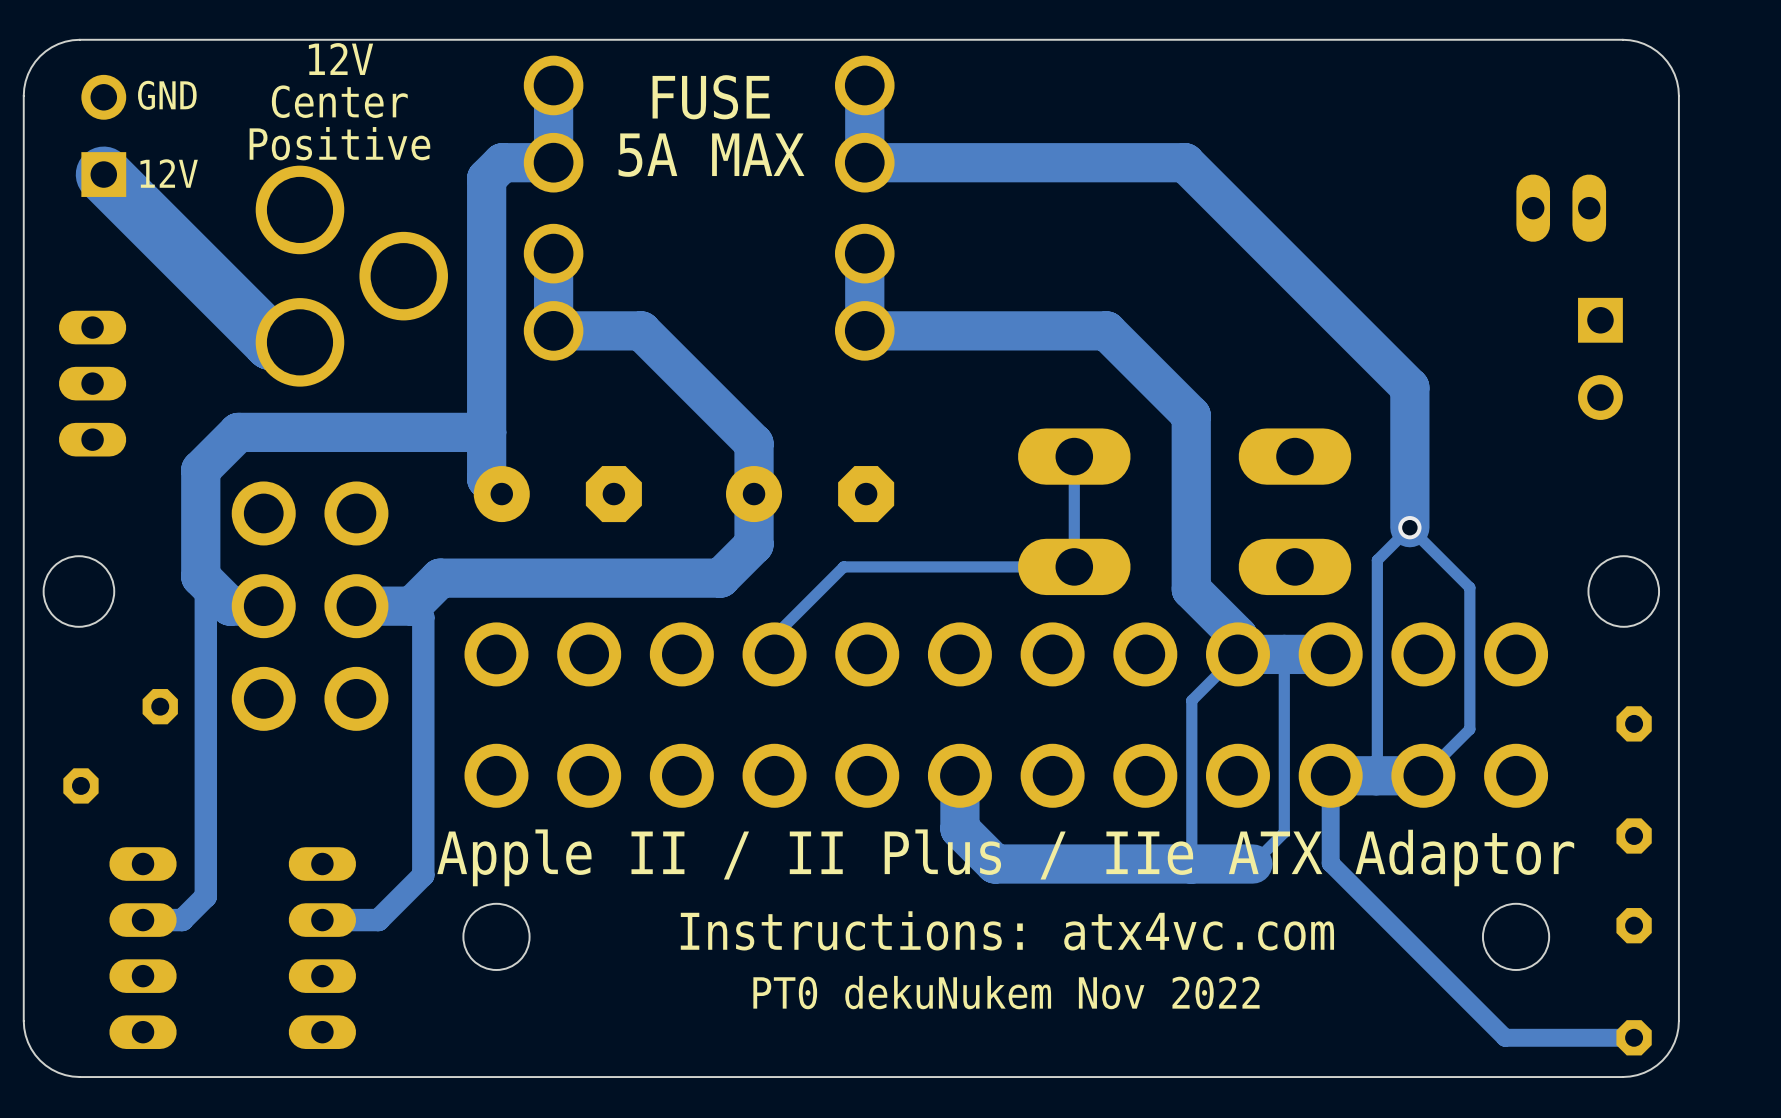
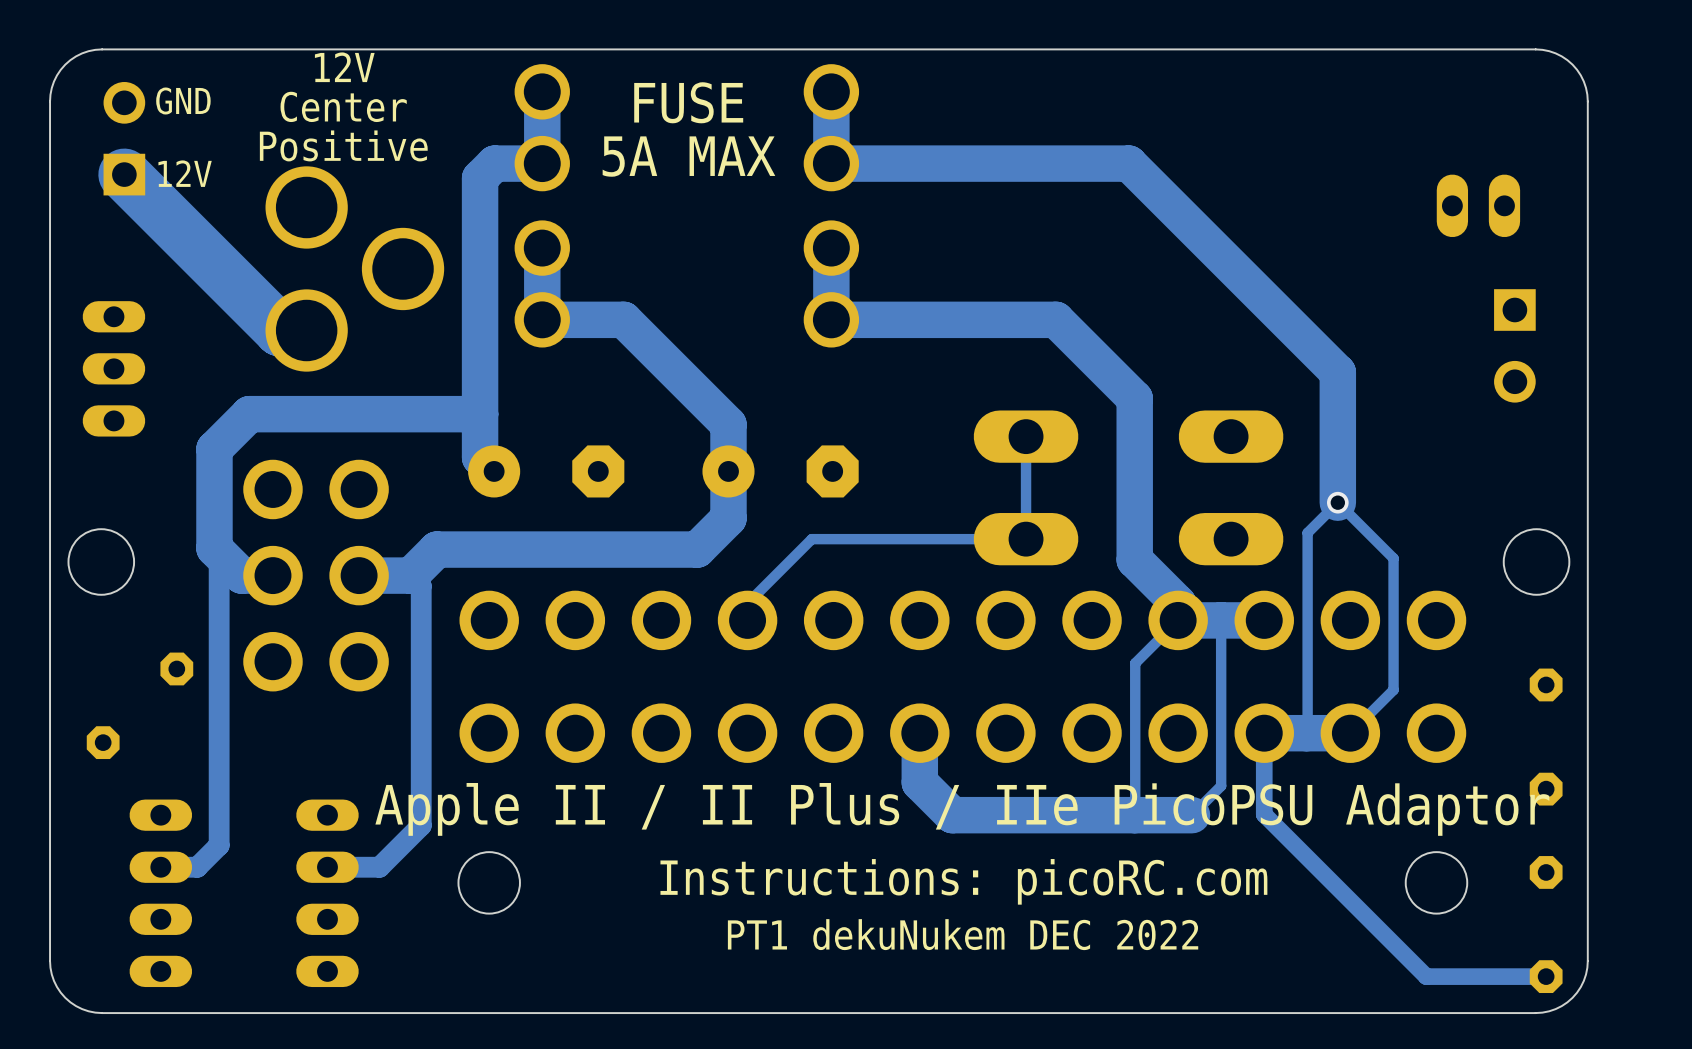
text: Apple II / II Plus / IIe ATX Adaptor (1005, 857) -> Apple II / II Plus / IIe PicoPSU Adaptor (962, 809)
text: Instructions: atx4vc.com (1007, 930) -> Instructions: picoRC.com (963, 881)
text: PT0 dekuNukem Nov 2022 (1006, 992) -> PT1 dekuNukem DEC 2022 (963, 934)

